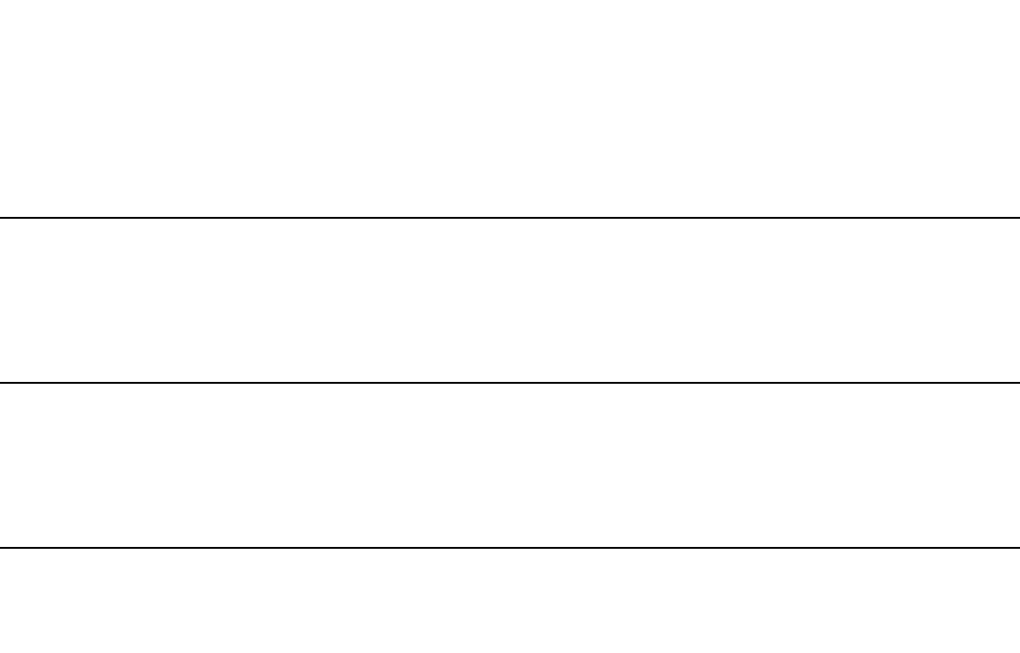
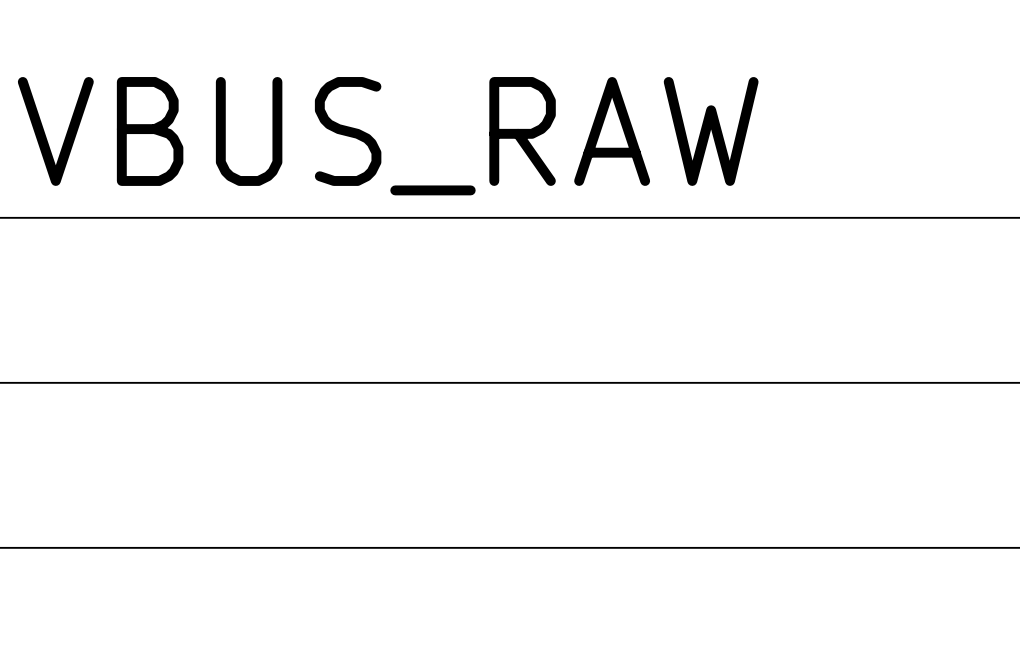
label: none -> VBUS_RAW (388, 136)

